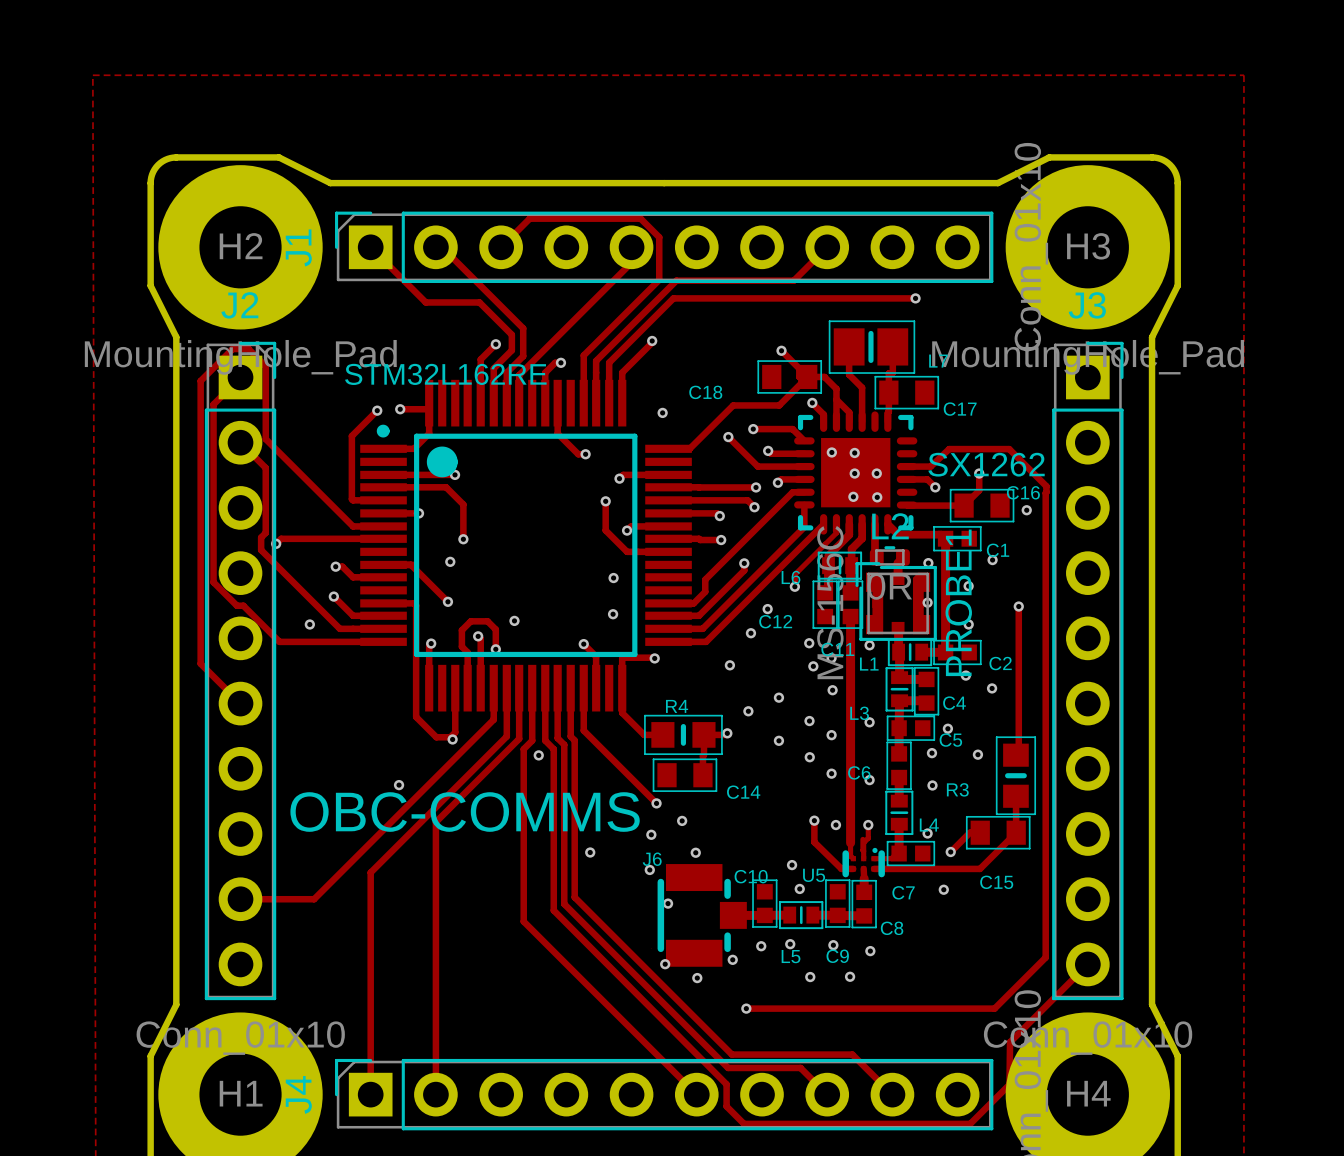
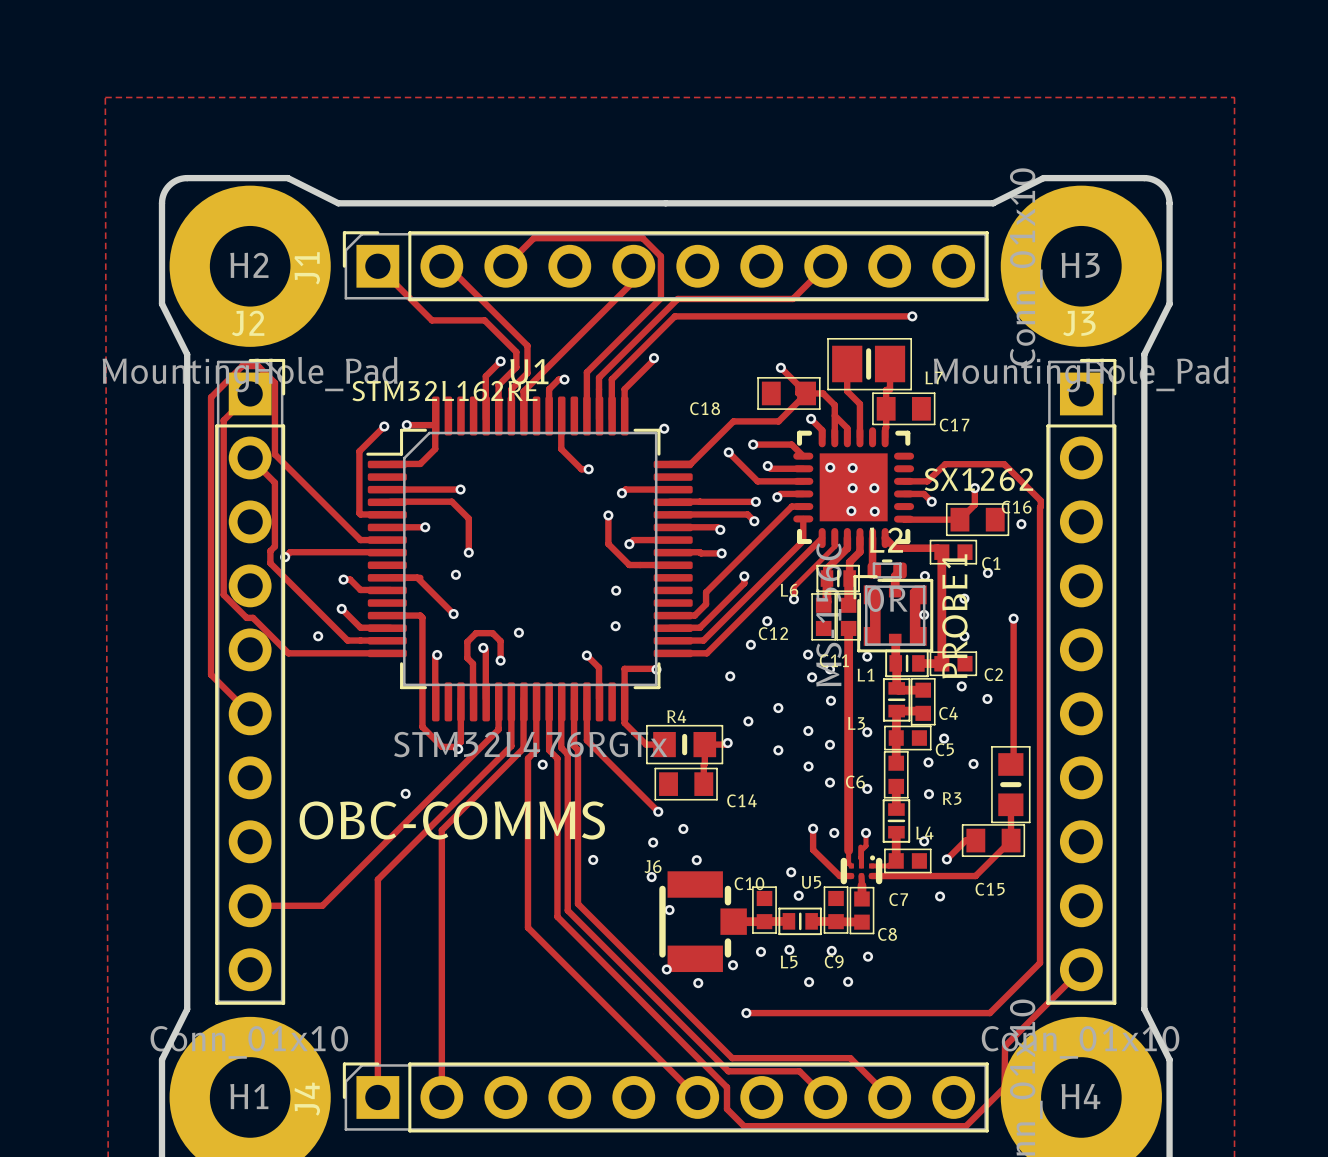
U1: none -> STM32L476RGTx (529, 558)
part: (526, 545) -> none

